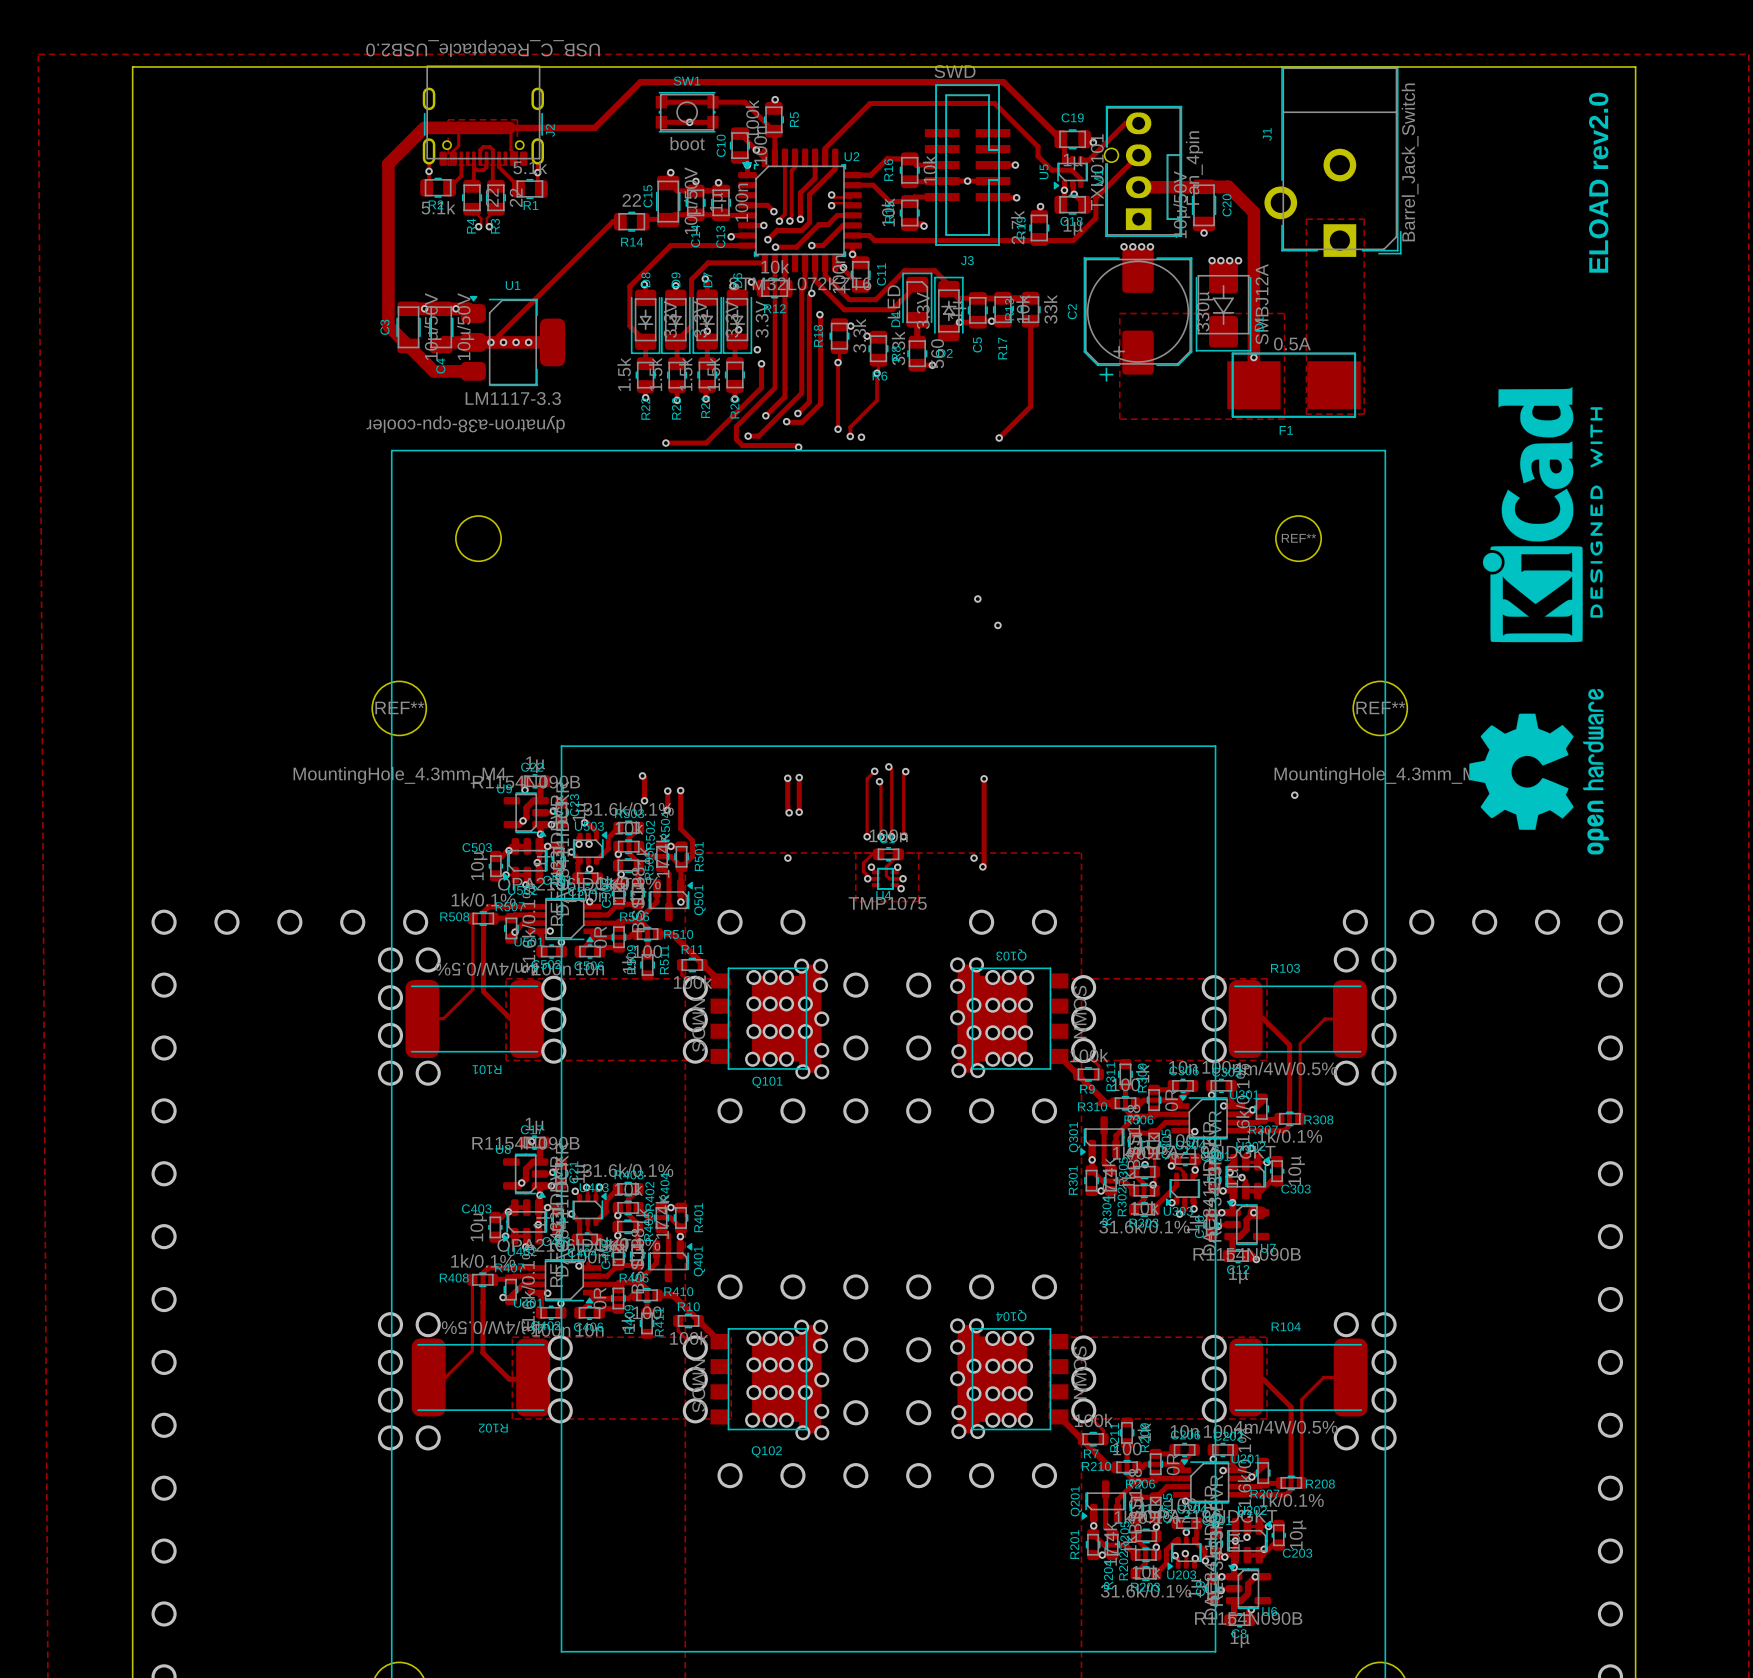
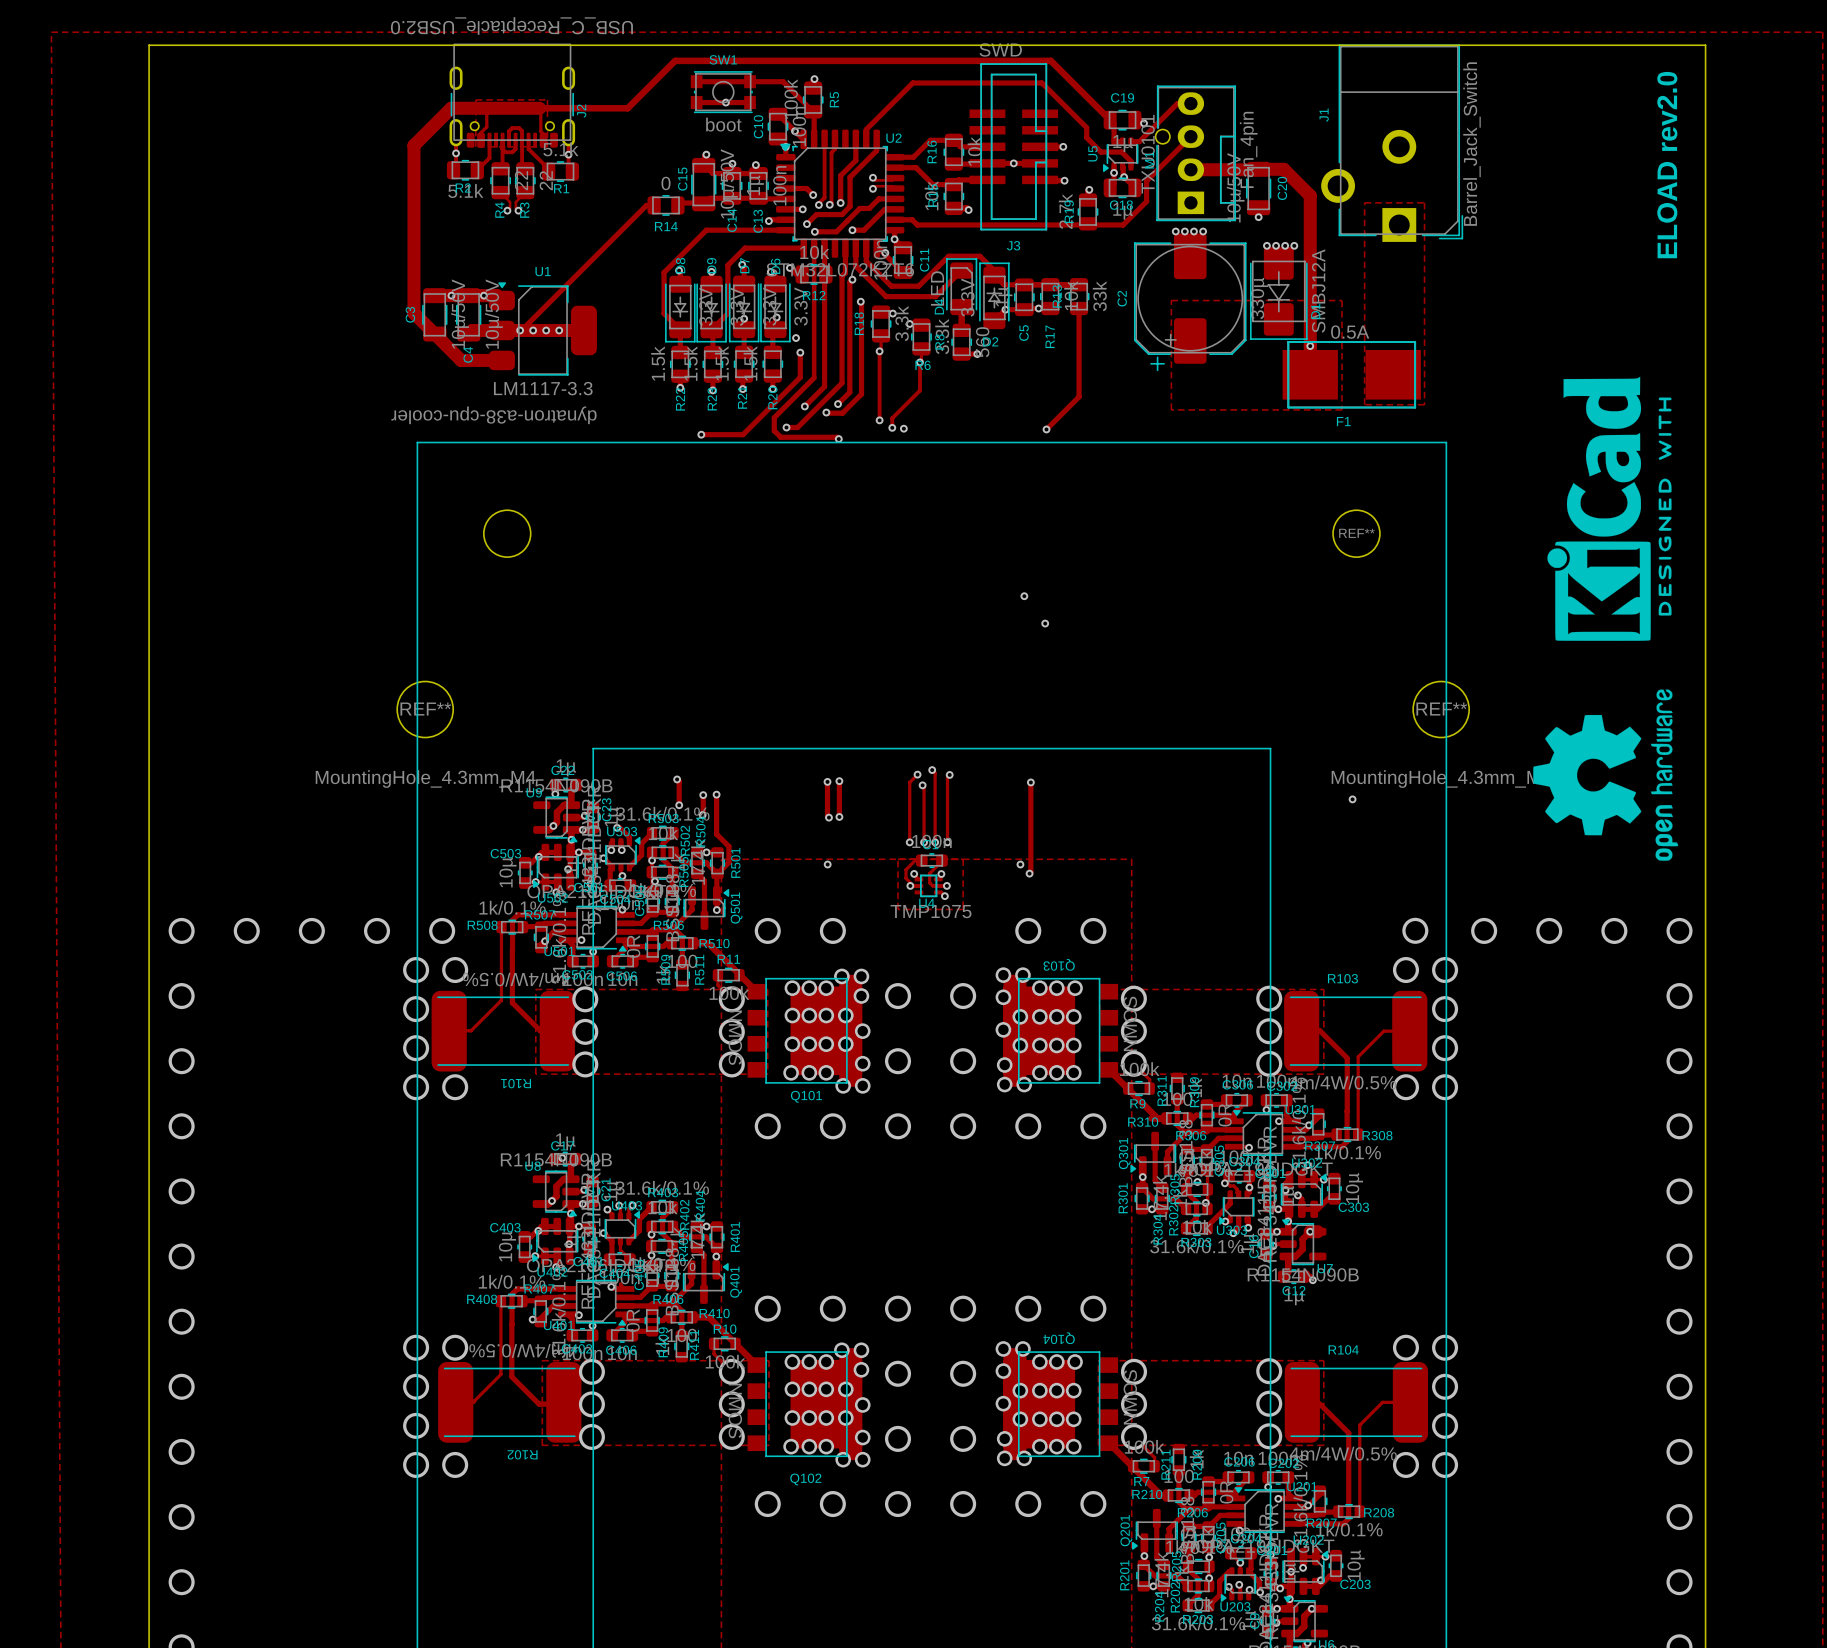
R14 value: 22 (631, 200) -> 0 (666, 183)

